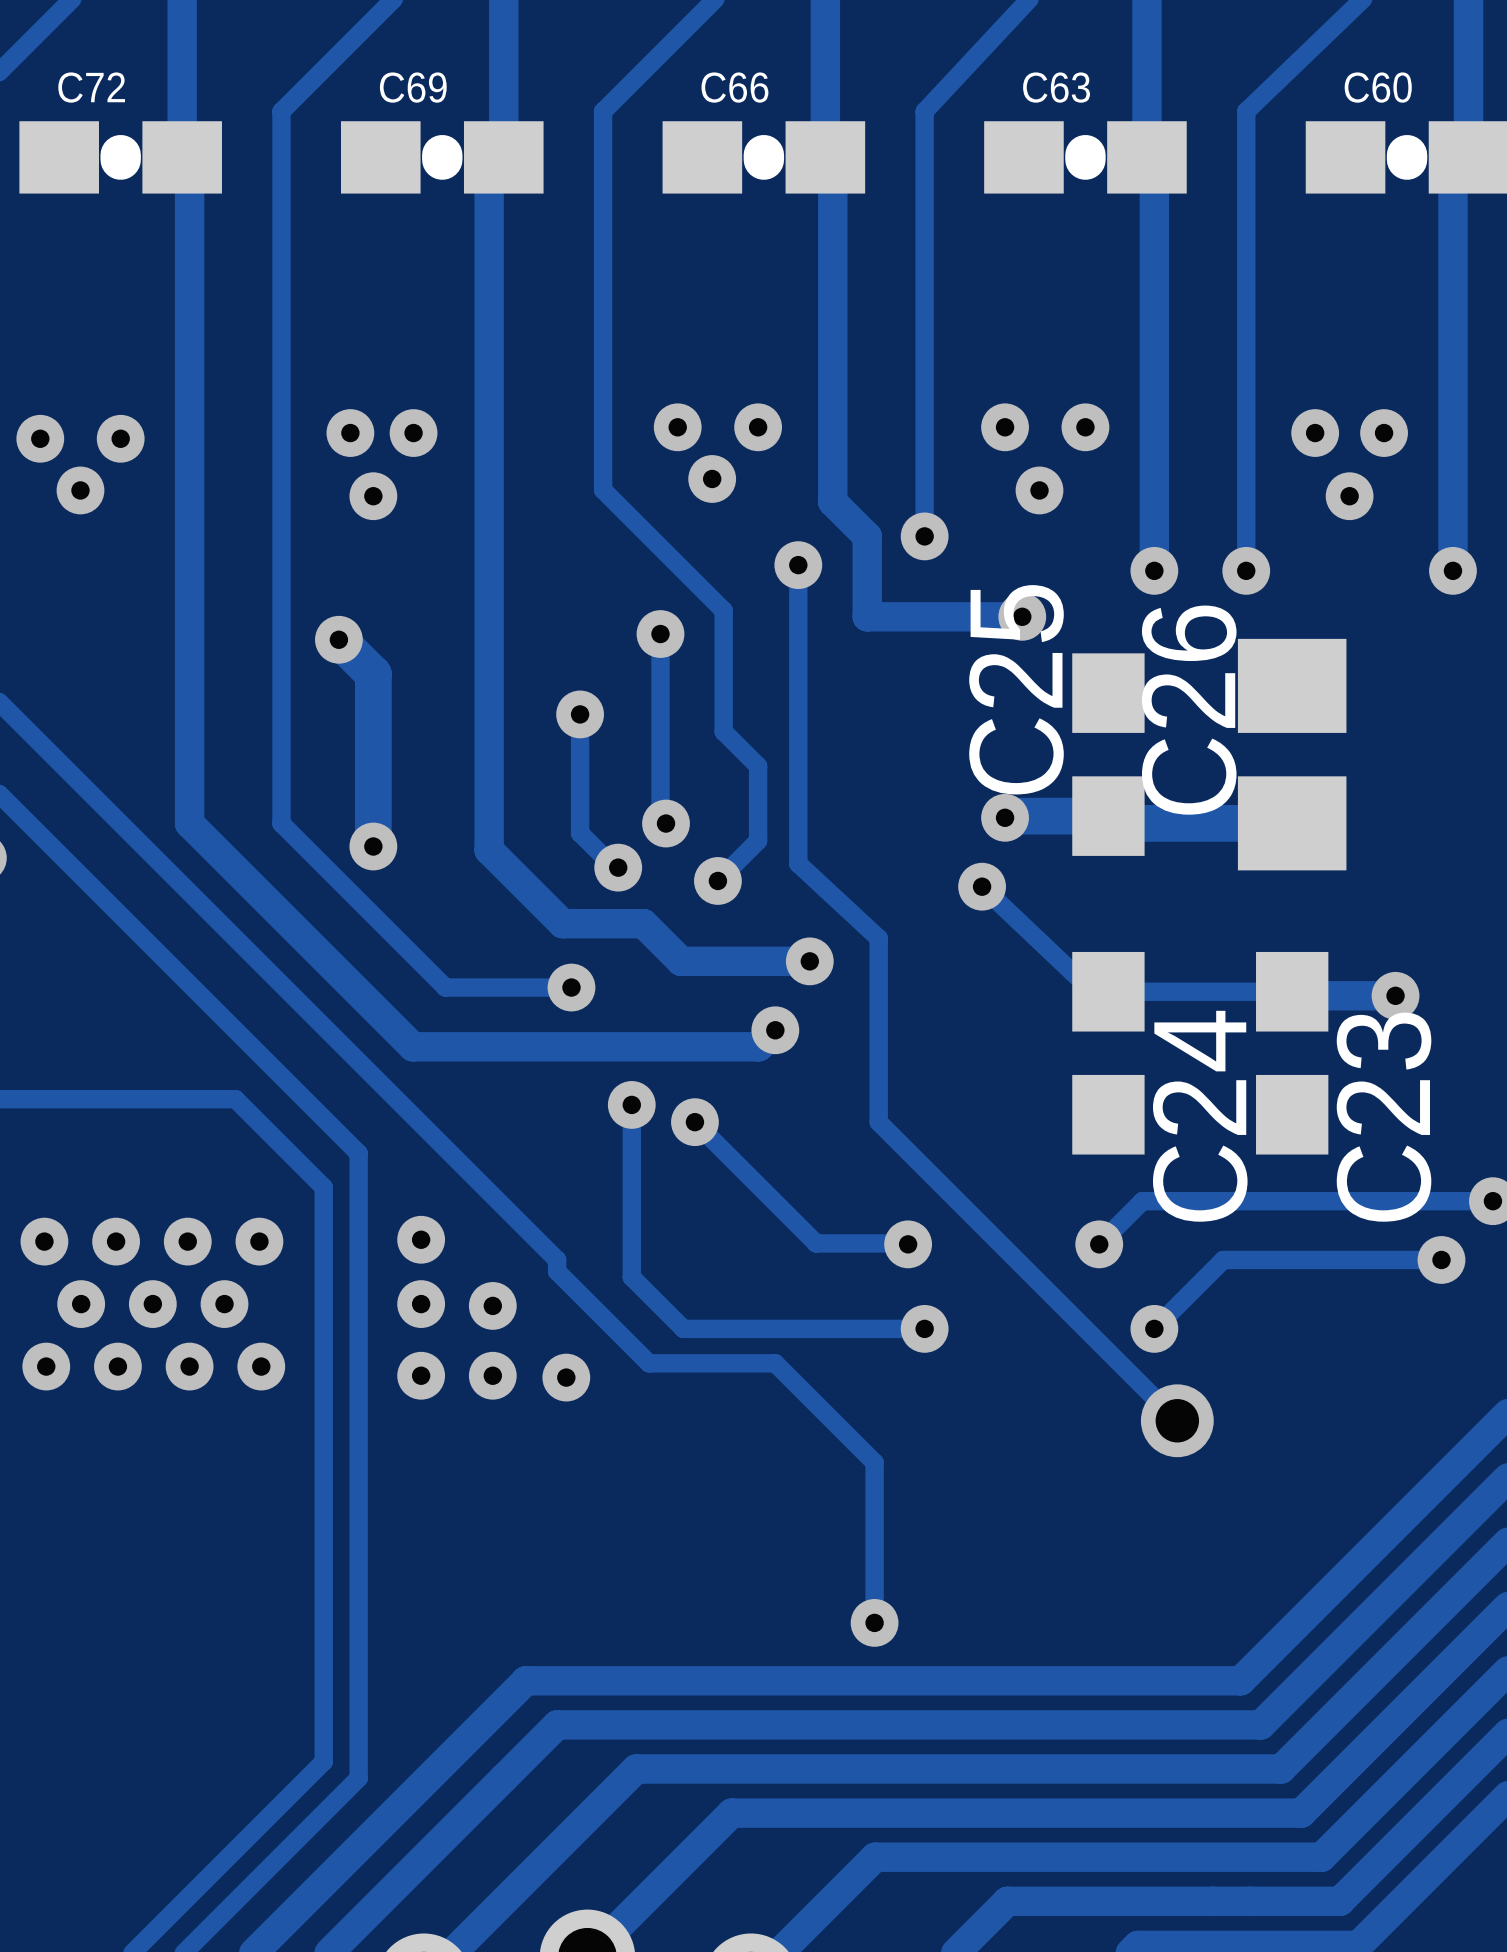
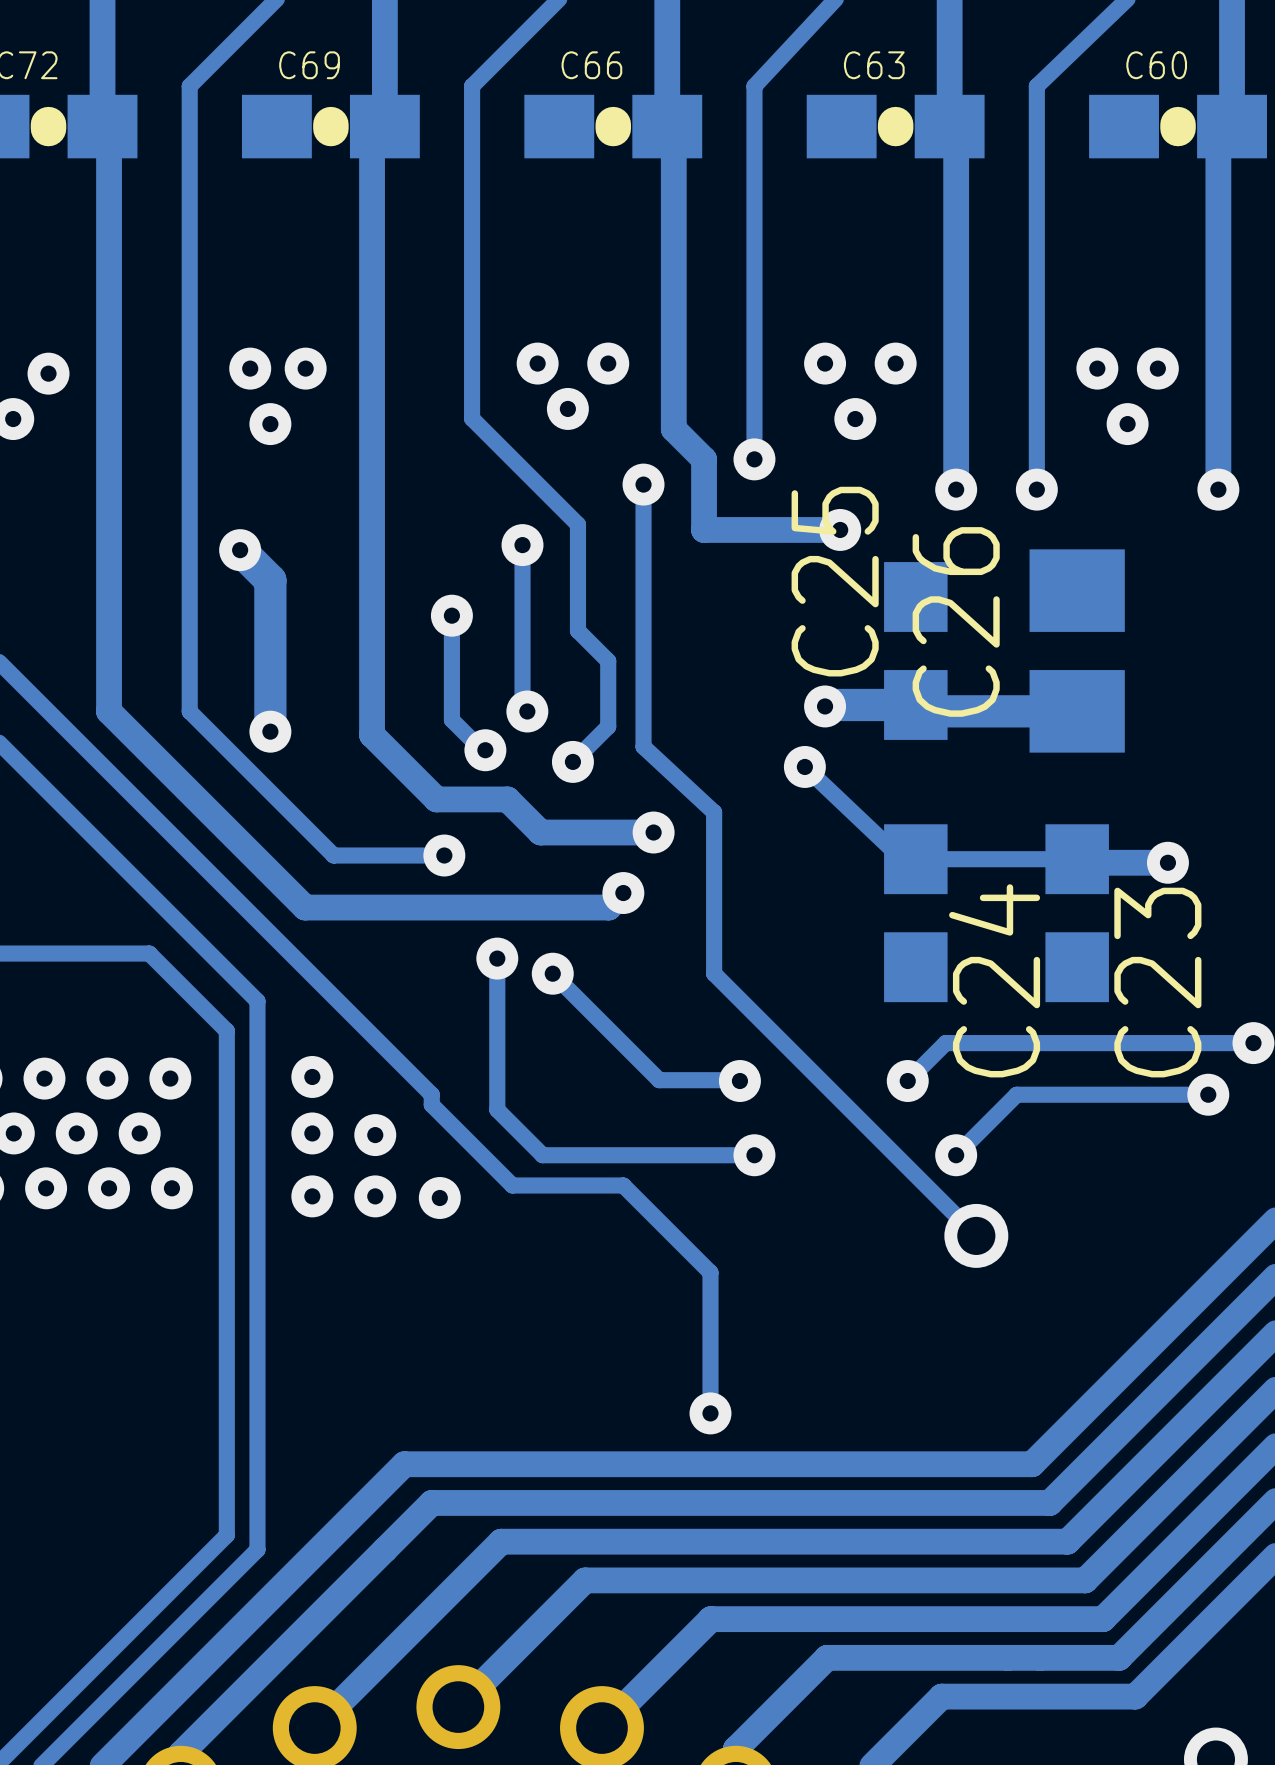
C26 name position: C26 (1189, 710) -> C26 (956, 621)

